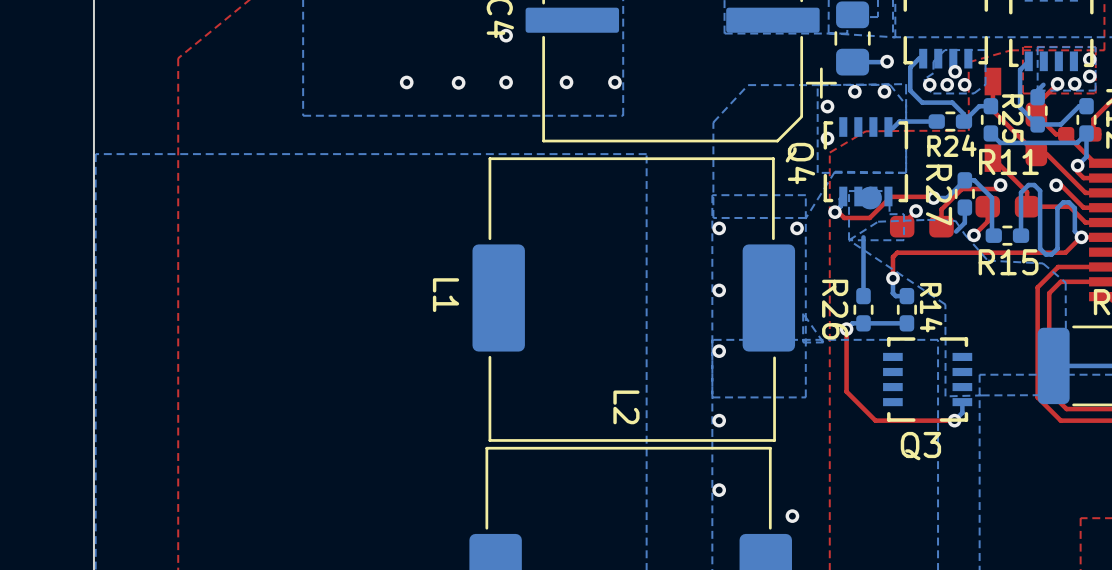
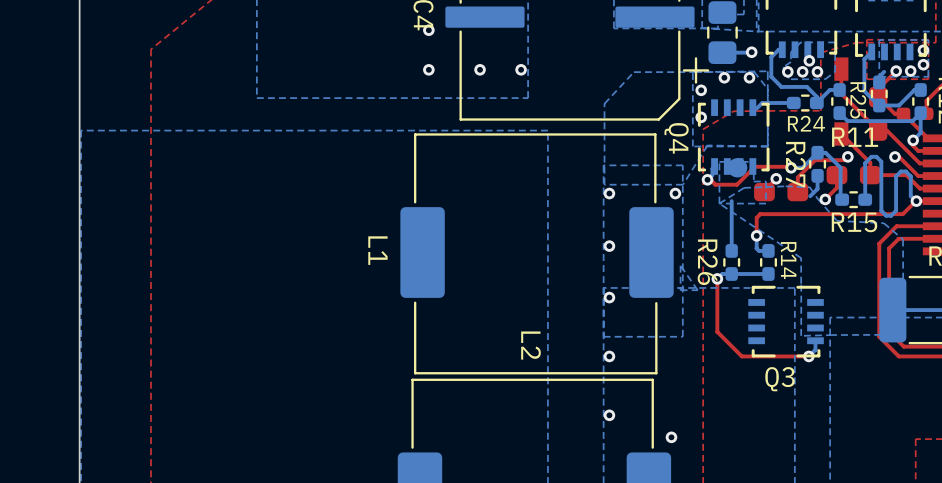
via: (406, 82) -> none
via: (458, 82) -> none

